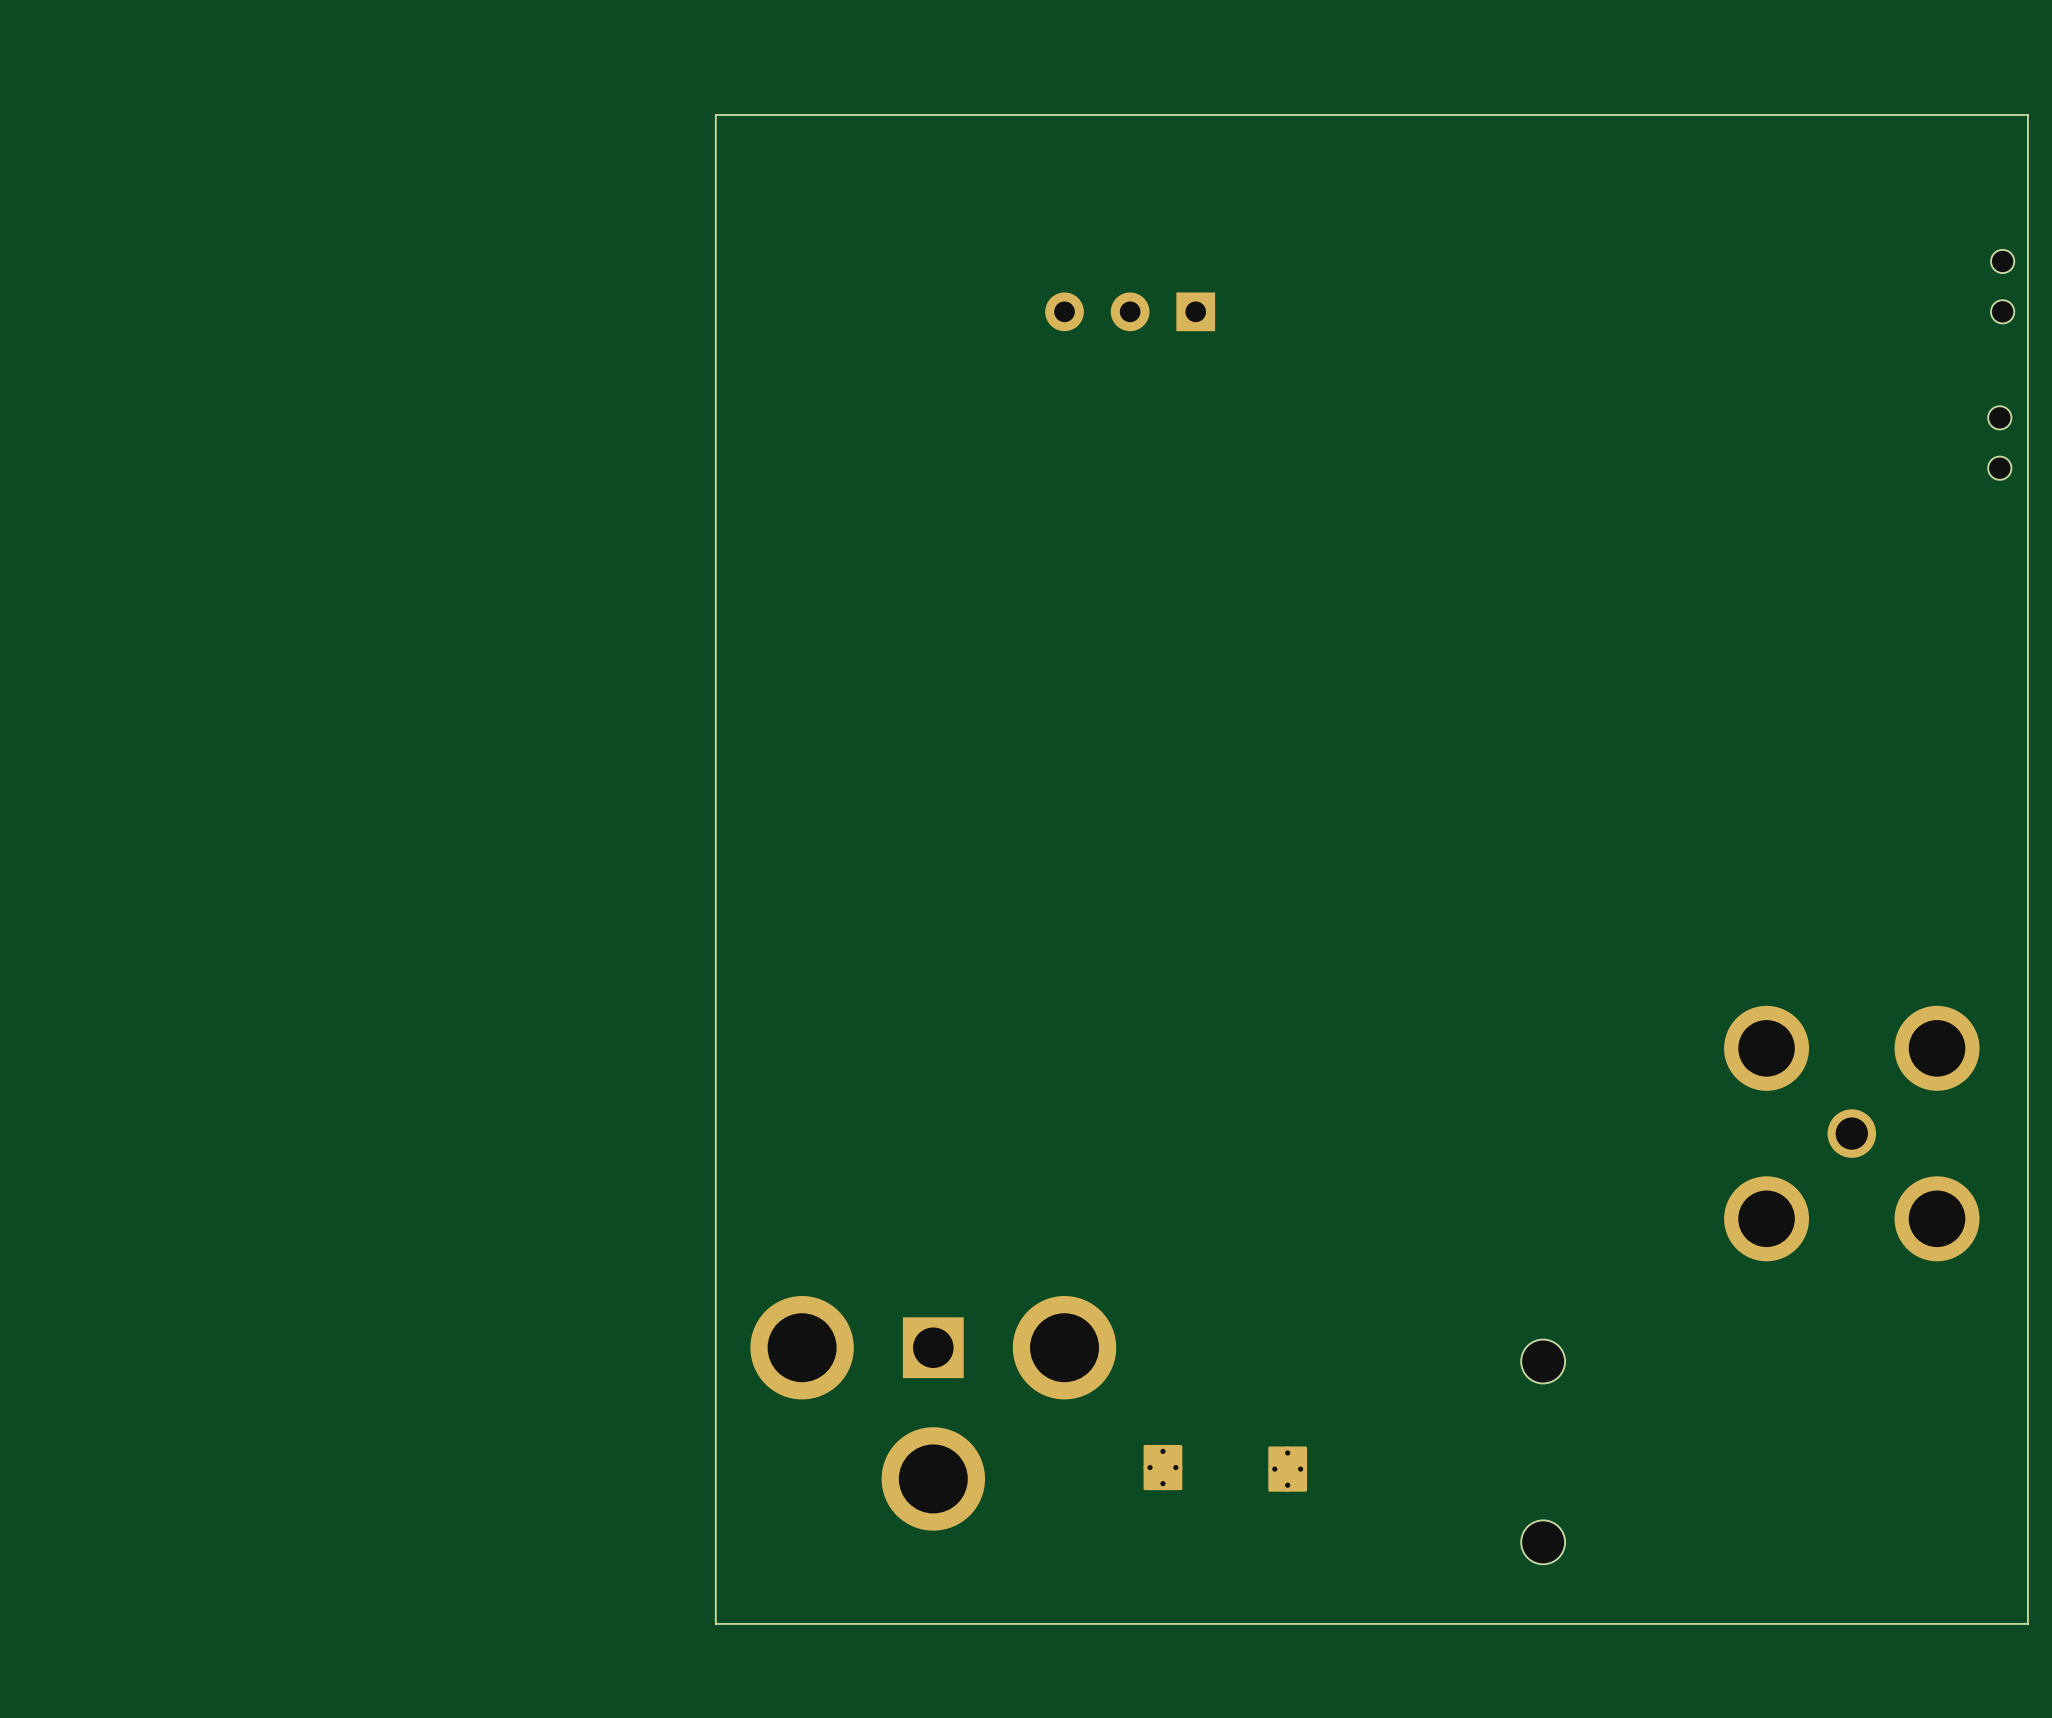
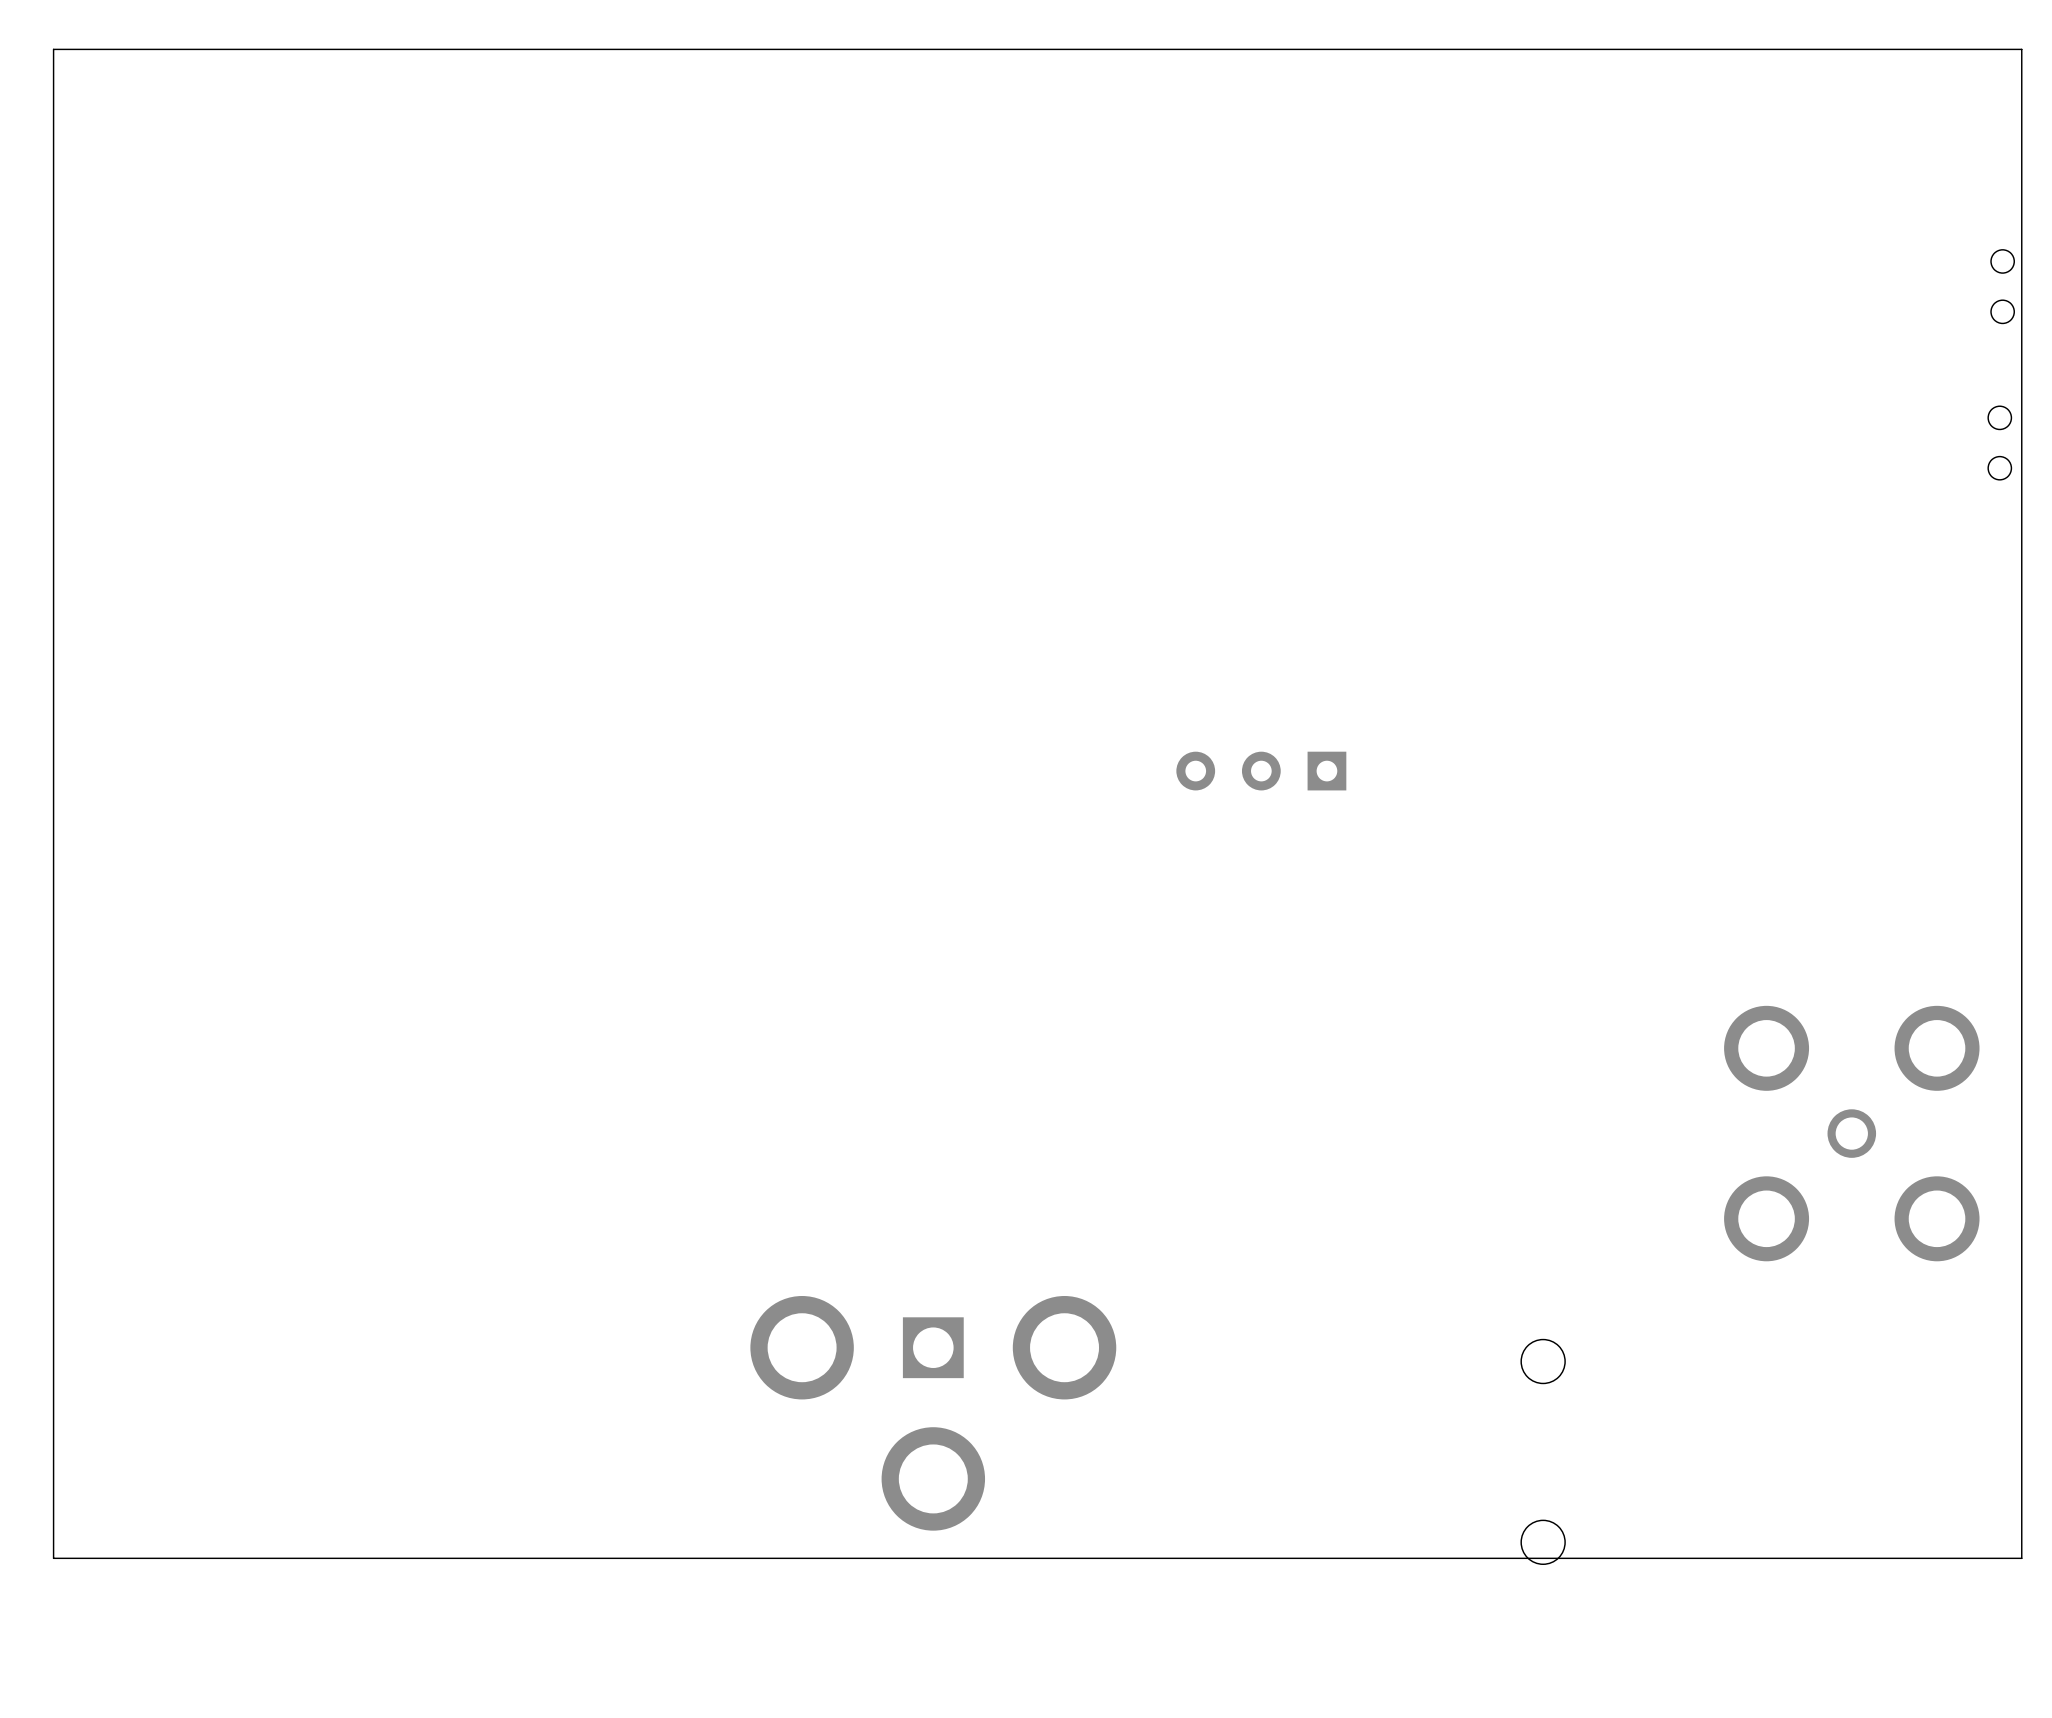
board edge: (2027, 115) (715, 115) (715, 1623) (2027, 1623) (2027, 115) -> (2021, 49) (2021, 1558) (53, 1558) (53, 49) (2021, 49)
part position: (1130, 311) -> (1261, 771)
part: (1162, 1467) -> none
part: (1287, 1469) -> none

